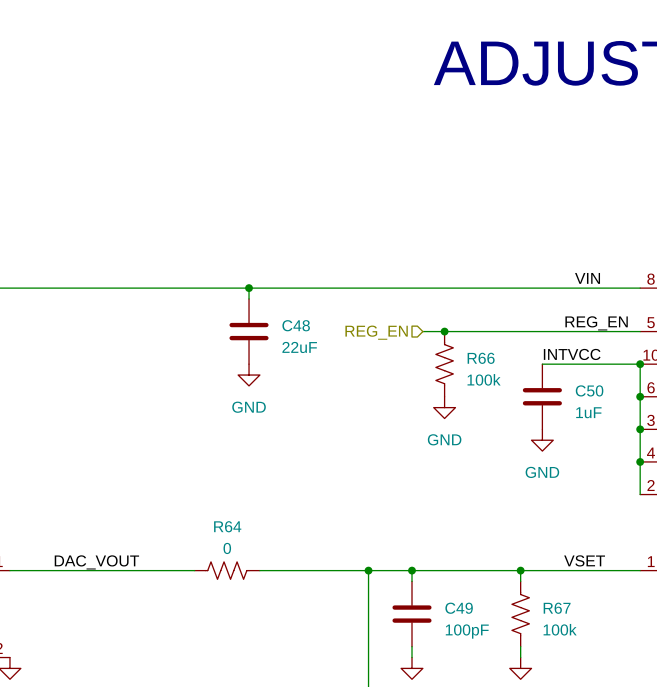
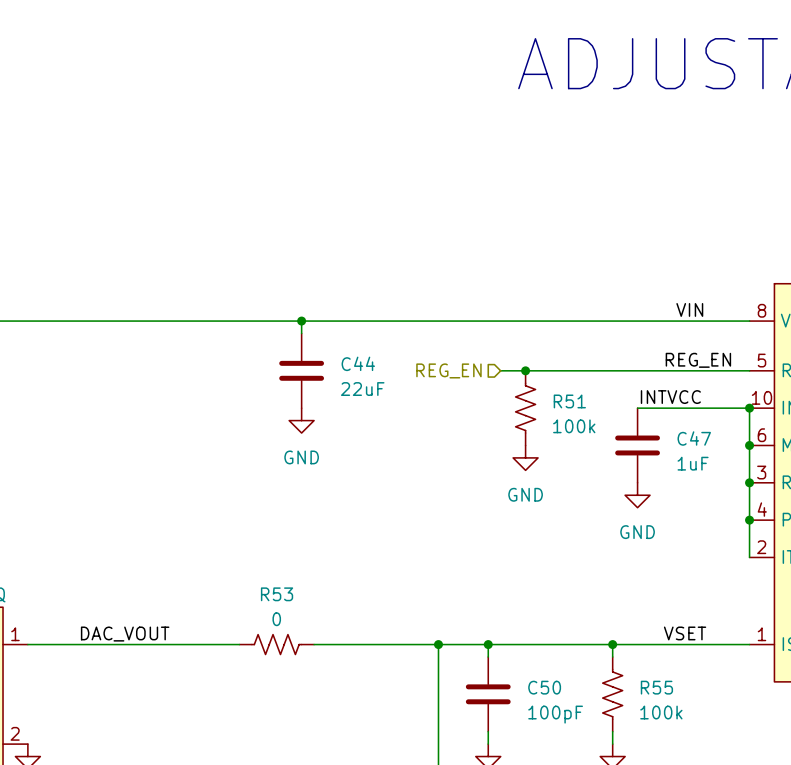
C48 name: C48 (296, 325) -> C44 (358, 363)
R66 name: R66 (481, 358) -> R51 (569, 401)
C50 name: C50 (589, 390) -> C47 (694, 438)
R64 name: R64 (227, 526) -> R53 (277, 594)
C49 name: C49 (459, 608) -> C50 (544, 687)
R67 name: R67 (557, 608) -> R55 (656, 687)

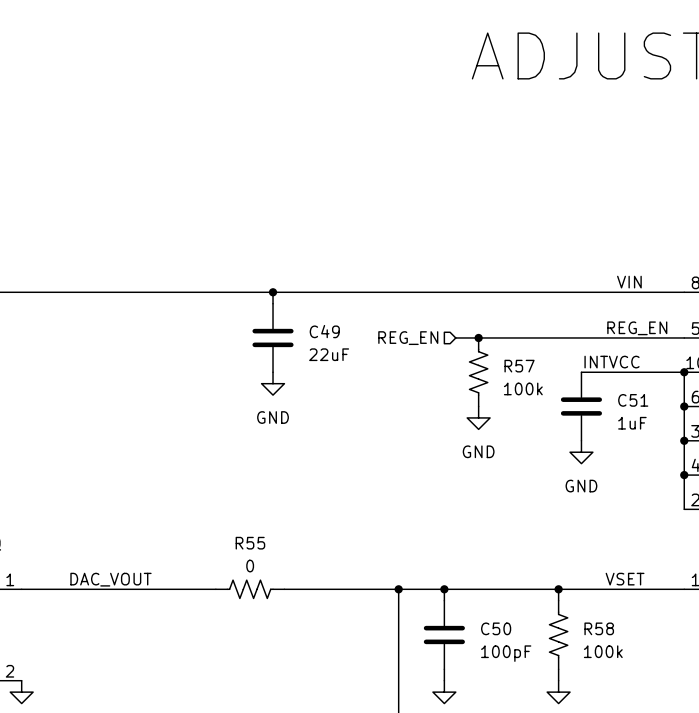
C44 name: C44 (358, 363) -> C49 (324, 331)
R51 name: R51 (569, 401) -> R57 (519, 366)
C47 name: C47 (694, 438) -> C51 (633, 400)
R53 name: R53 (277, 594) -> R55 (250, 543)
R55 name: R55 (656, 687) -> R58 (599, 628)

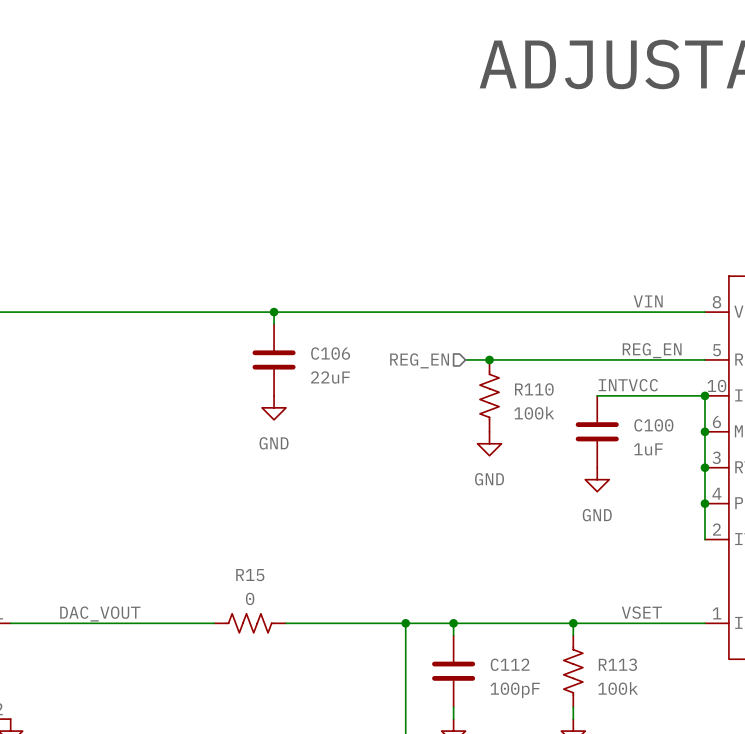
C49 name: C49 (324, 331) -> C106 (330, 353)
R57 name: R57 (519, 366) -> R110 (534, 389)
C51 name: C51 (633, 400) -> C100 (653, 425)
R55 name: R55 (250, 543) -> R15 (250, 575)
C50 name: C50 (496, 628) -> C112 (510, 664)
R58 name: R58 (599, 628) -> R113 (617, 664)

